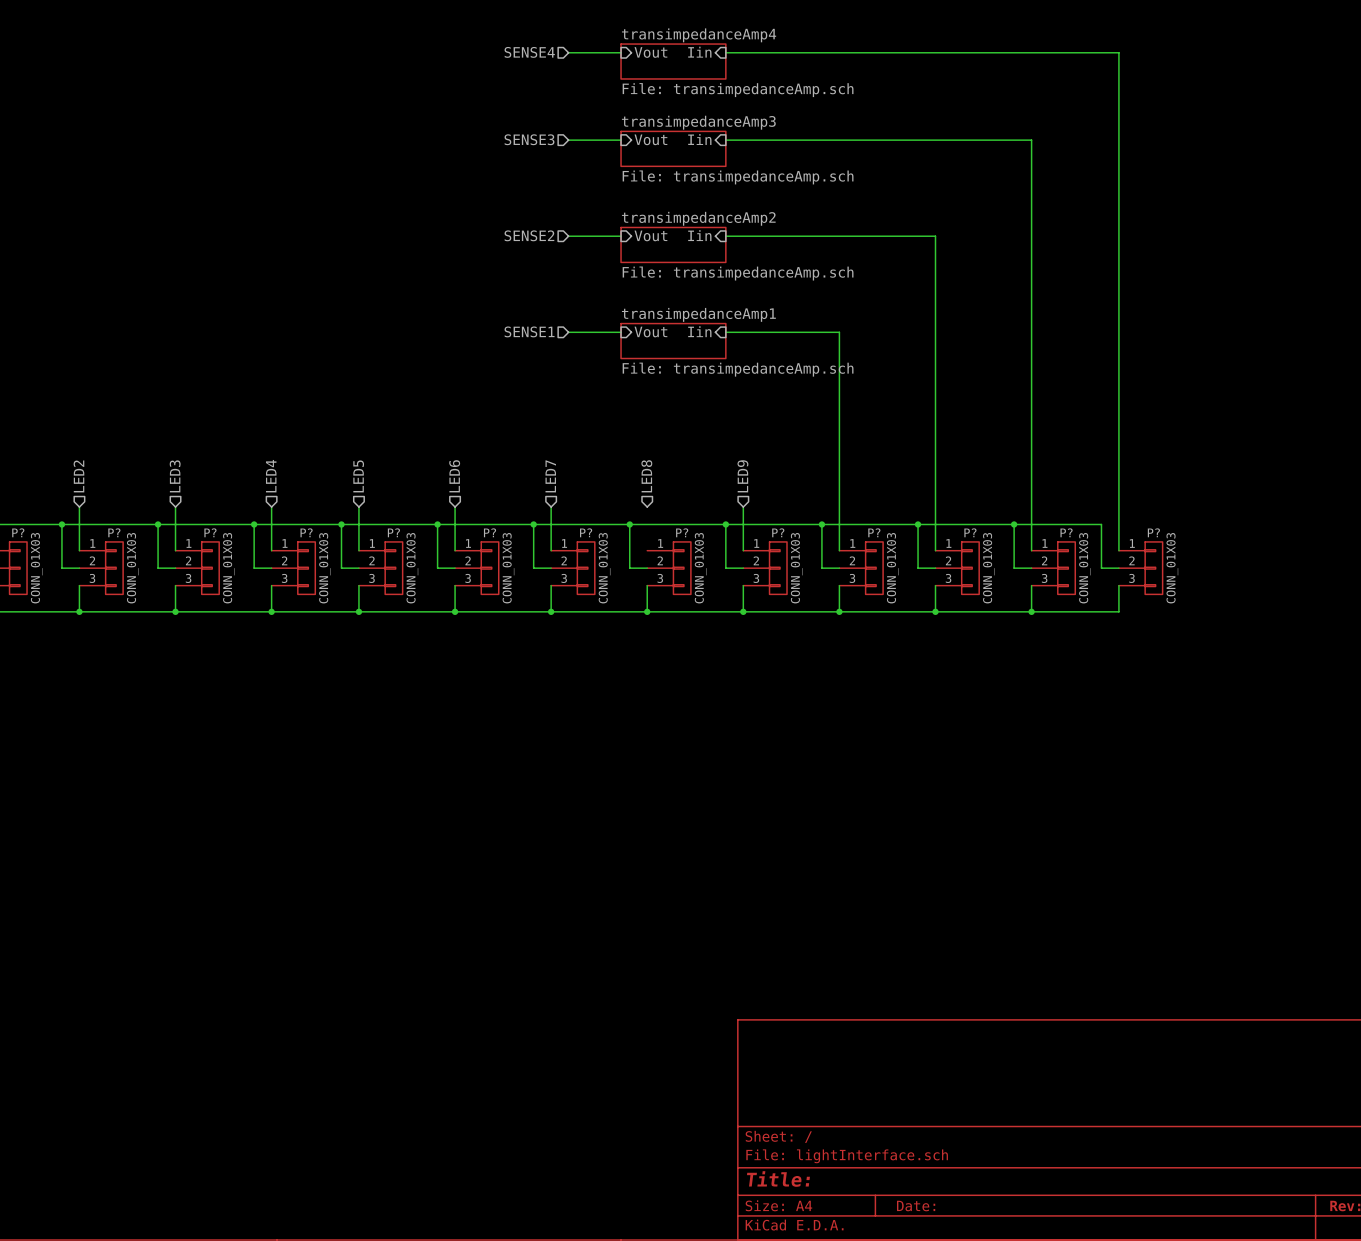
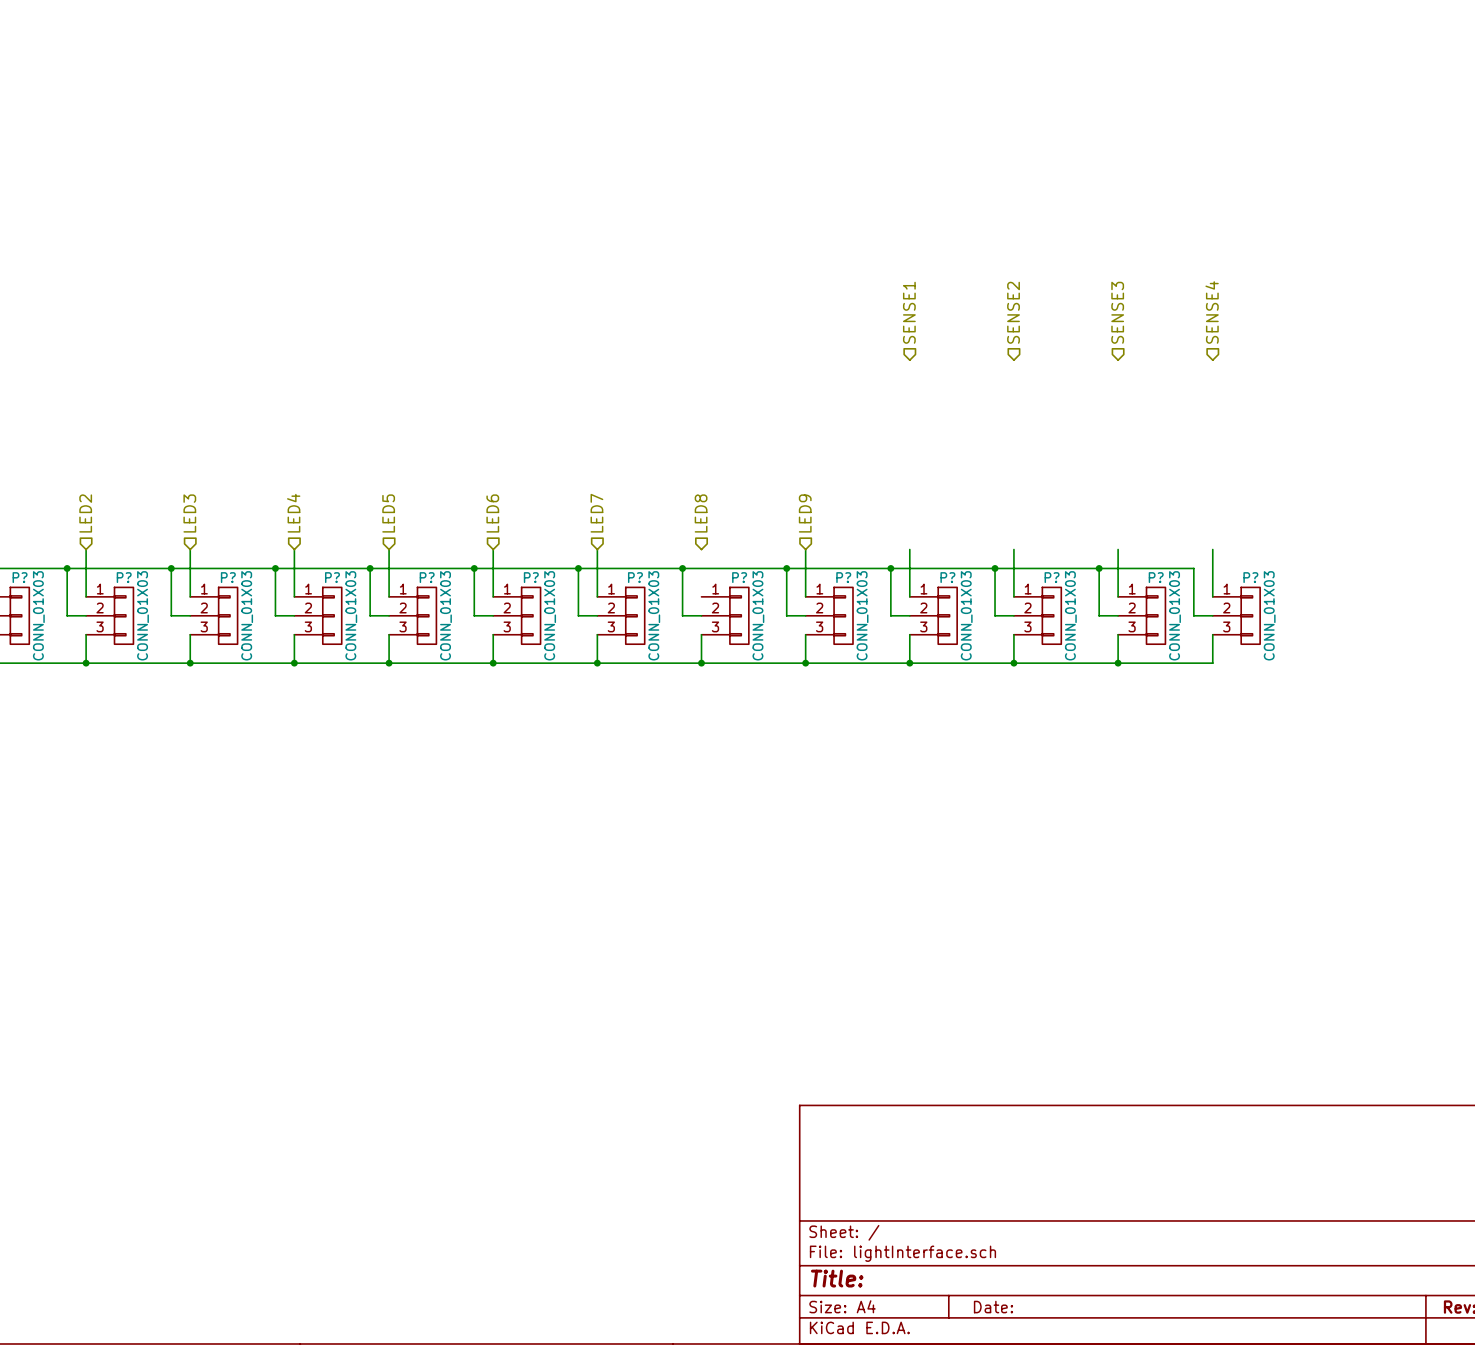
hierarchical label: SENSE4 (529, 52) -> none
wire: (568, 52) (621, 52) -> none
sheet pin: Vout (650, 52) -> none
sheet pin: Iin (699, 52) -> none
wire: (725, 52) (1118, 52) (1118, 507) -> none
sheet transimpedanceAmp4: File: transimpedanceAmp.sch (673, 61) -> none
hierarchical label: SENSE3 (529, 139) -> none
sheet pin: Vout (650, 139) -> none
sheet pin: Iin (699, 139) -> none
wire: (568, 140) (621, 140) -> none
wire: (725, 140) (1031, 140) (1031, 507) -> none
sheet transimpedanceAmp3: File: transimpedanceAmp.sch (673, 148) -> none
hierarchical label: SENSE2 (529, 235) -> none
sheet pin: Vout (650, 235) -> none
sheet pin: Iin (699, 235) -> none
wire: (568, 236) (621, 236) -> none
wire: (725, 236) (935, 236) (935, 507) -> none
sheet transimpedanceAmp2: File: transimpedanceAmp.sch (673, 244) -> none
hierarchical label: none -> SENSE1 (909, 312)
hierarchical label: none -> SENSE2 (1013, 312)
hierarchical label: none -> SENSE3 (1117, 312)
hierarchical label: none -> SENSE4 (1212, 312)
hierarchical label: SENSE1 (529, 331) -> none
sheet pin: Iin (699, 331) -> none
wire: (568, 332) (621, 332) -> none
sheet pin: Vout (650, 332) -> none
wire: (725, 332) (839, 332) (839, 507) -> none
sheet transimpedanceAmp1: File: transimpedanceAmp.sch (673, 341) -> none

